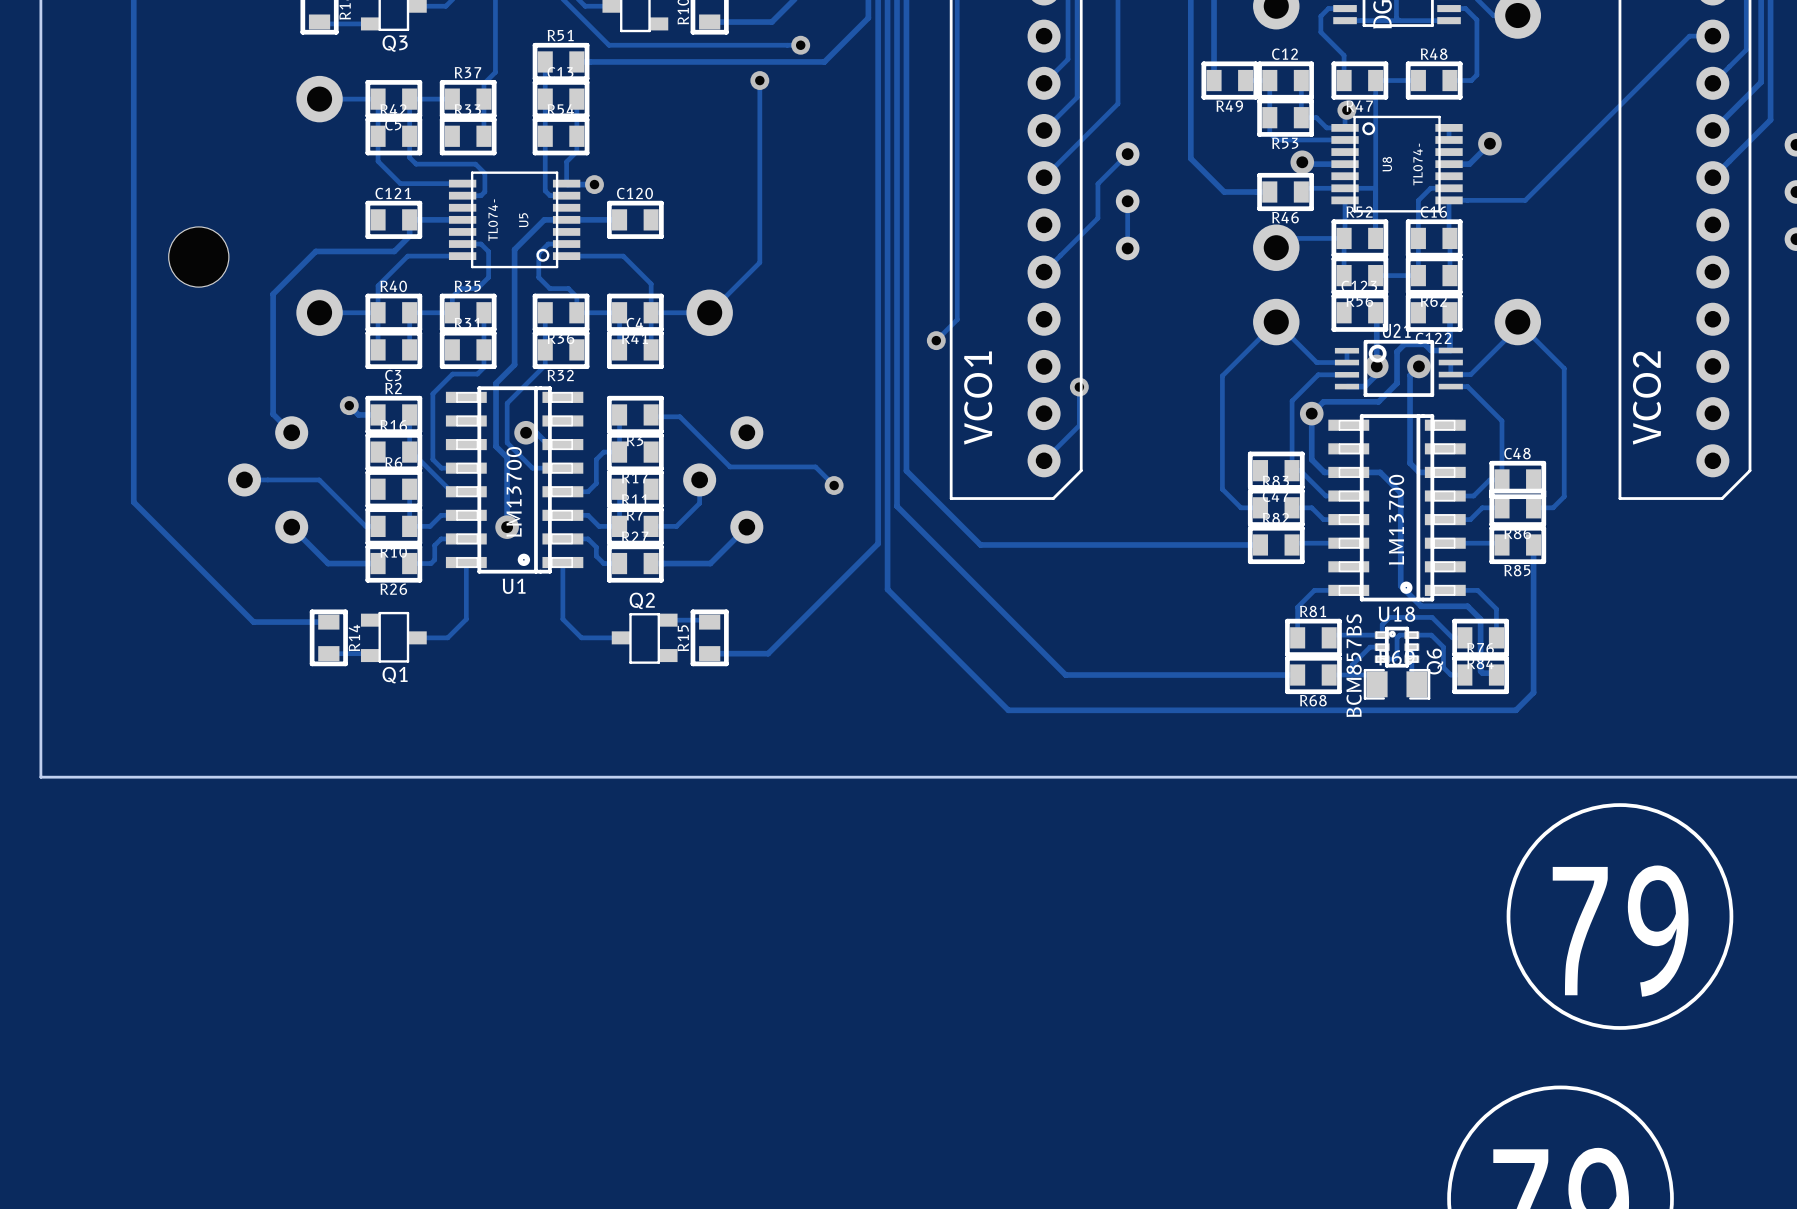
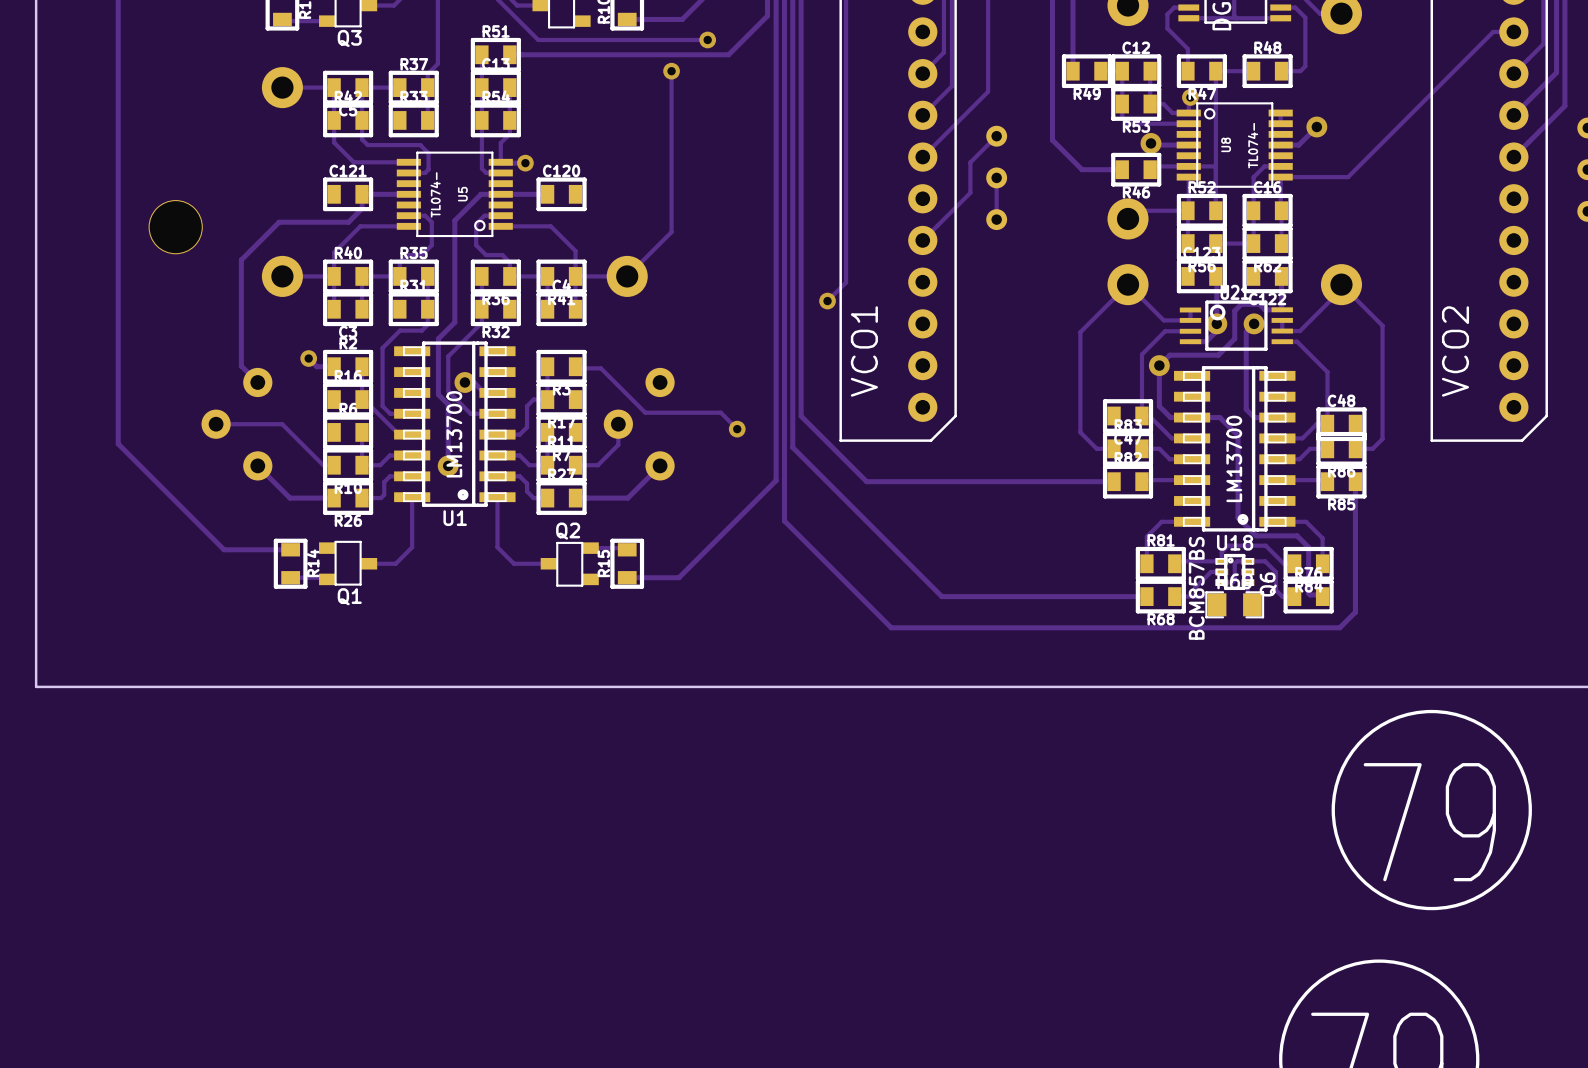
track: (1079, 387) (1079, 425) (1044, 460) -> none
via: (1079, 387) -> none

